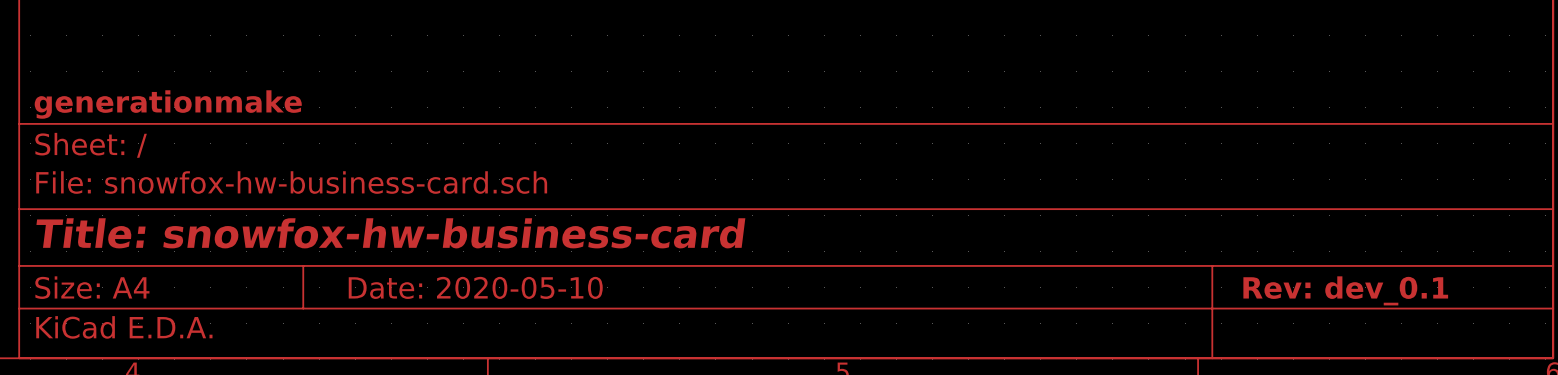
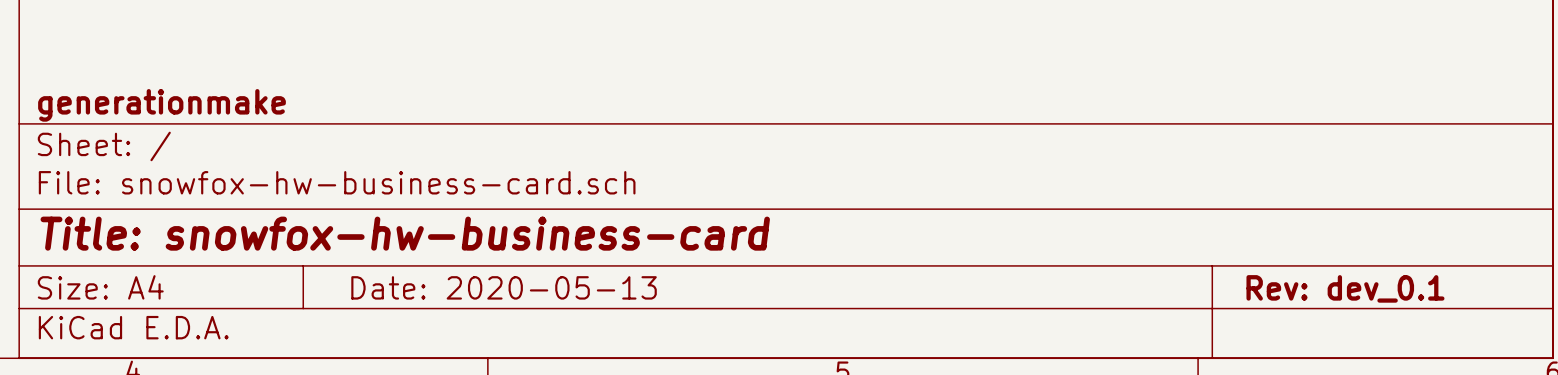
title block: Date: 2020-05-10 (475, 287) -> Date: 2020-05-13 (504, 287)

